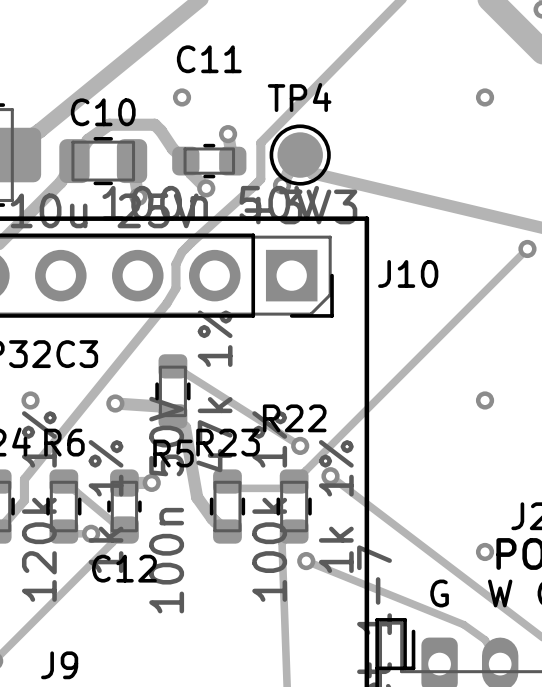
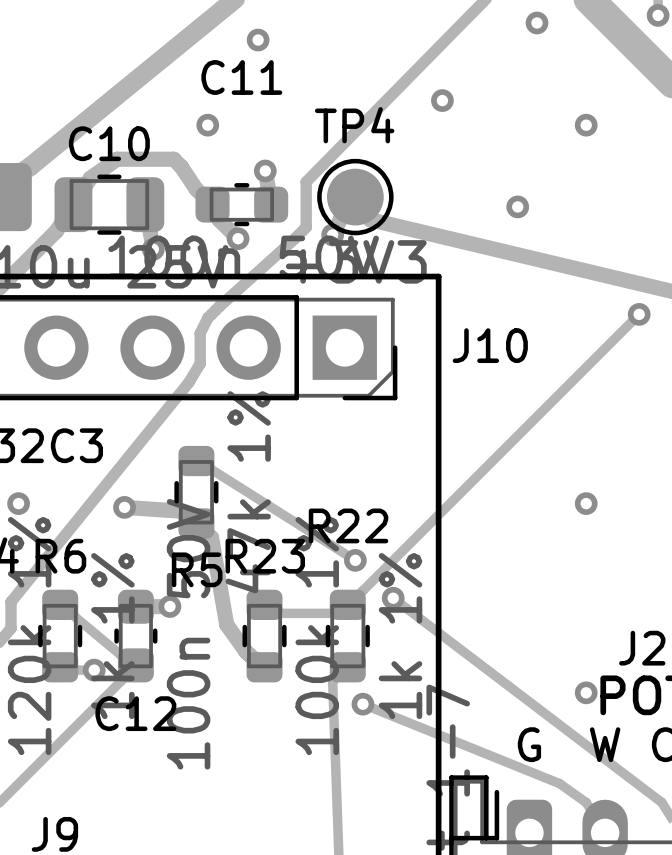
via: none -> (537, 23)
via: none -> (258, 40)
via: none -> (442, 100)
via: none -> (517, 206)

